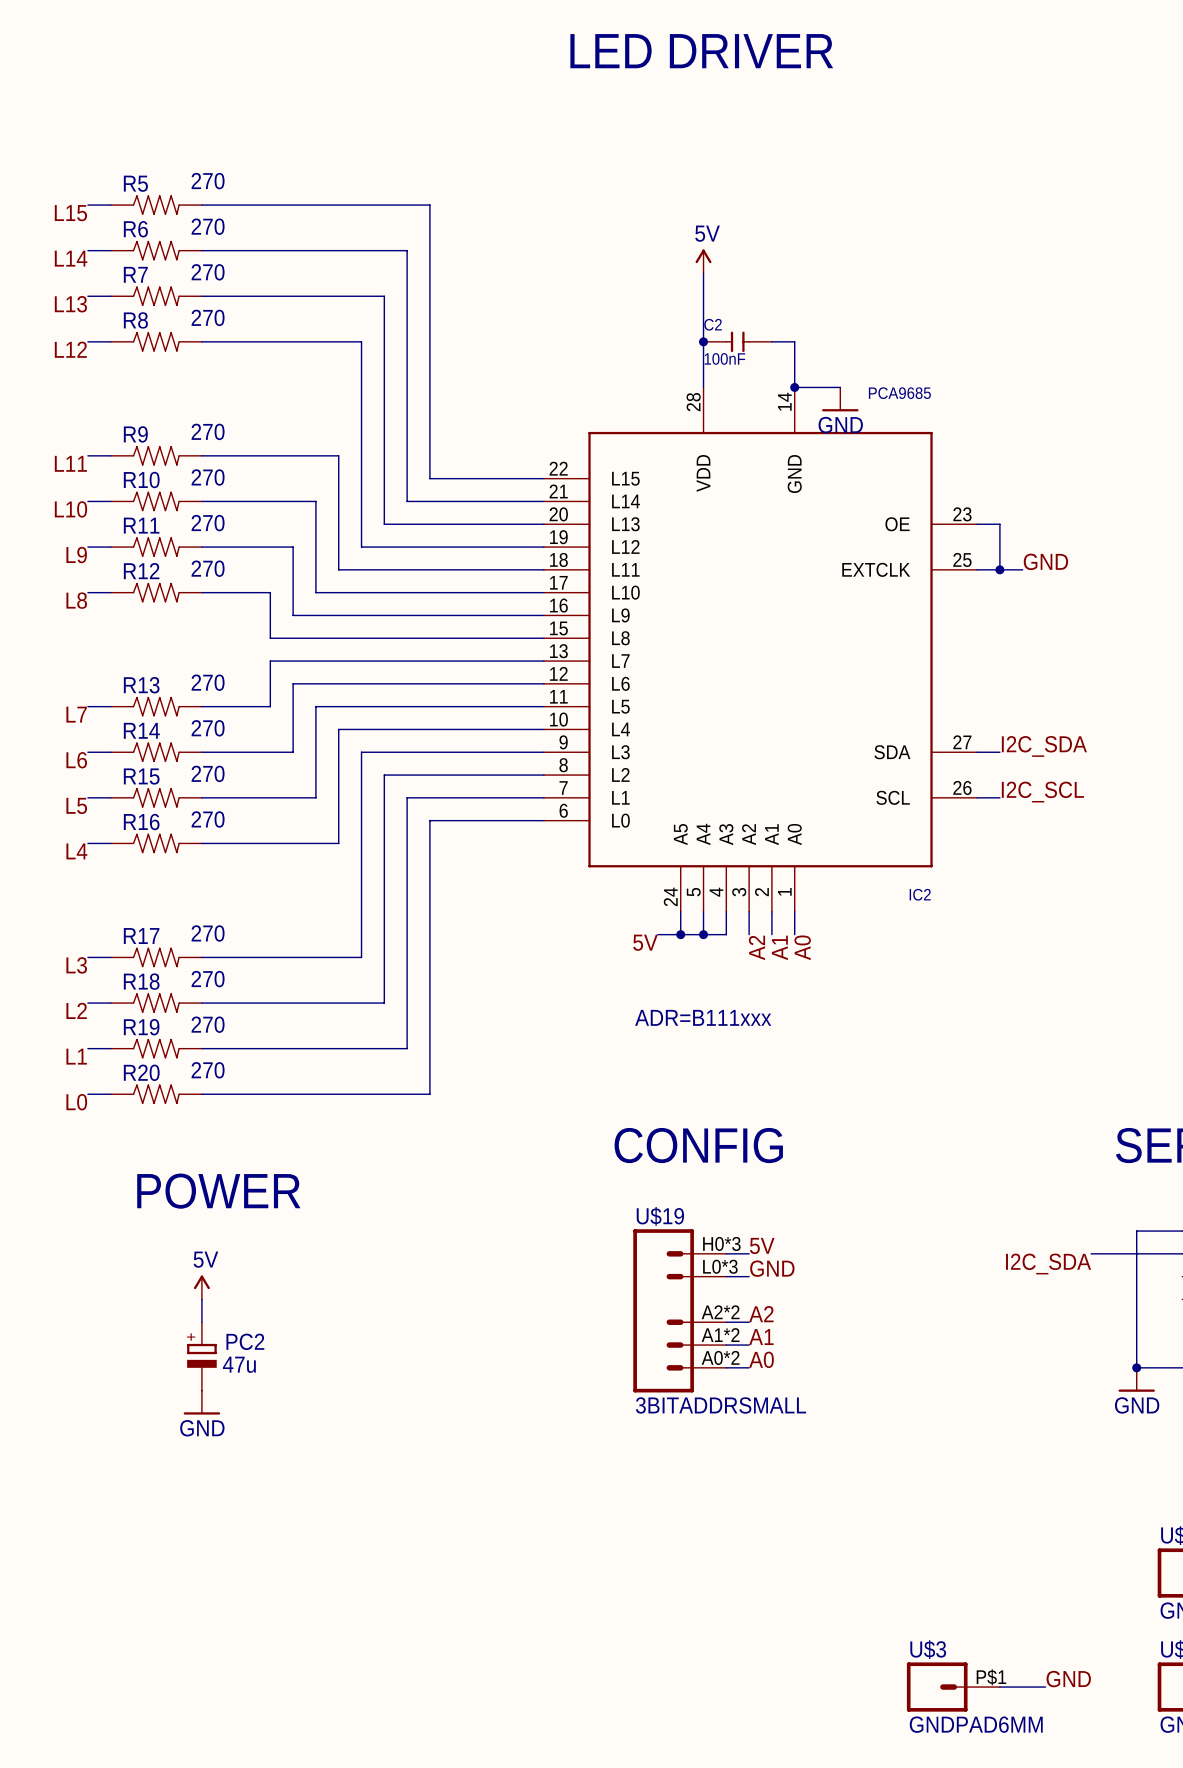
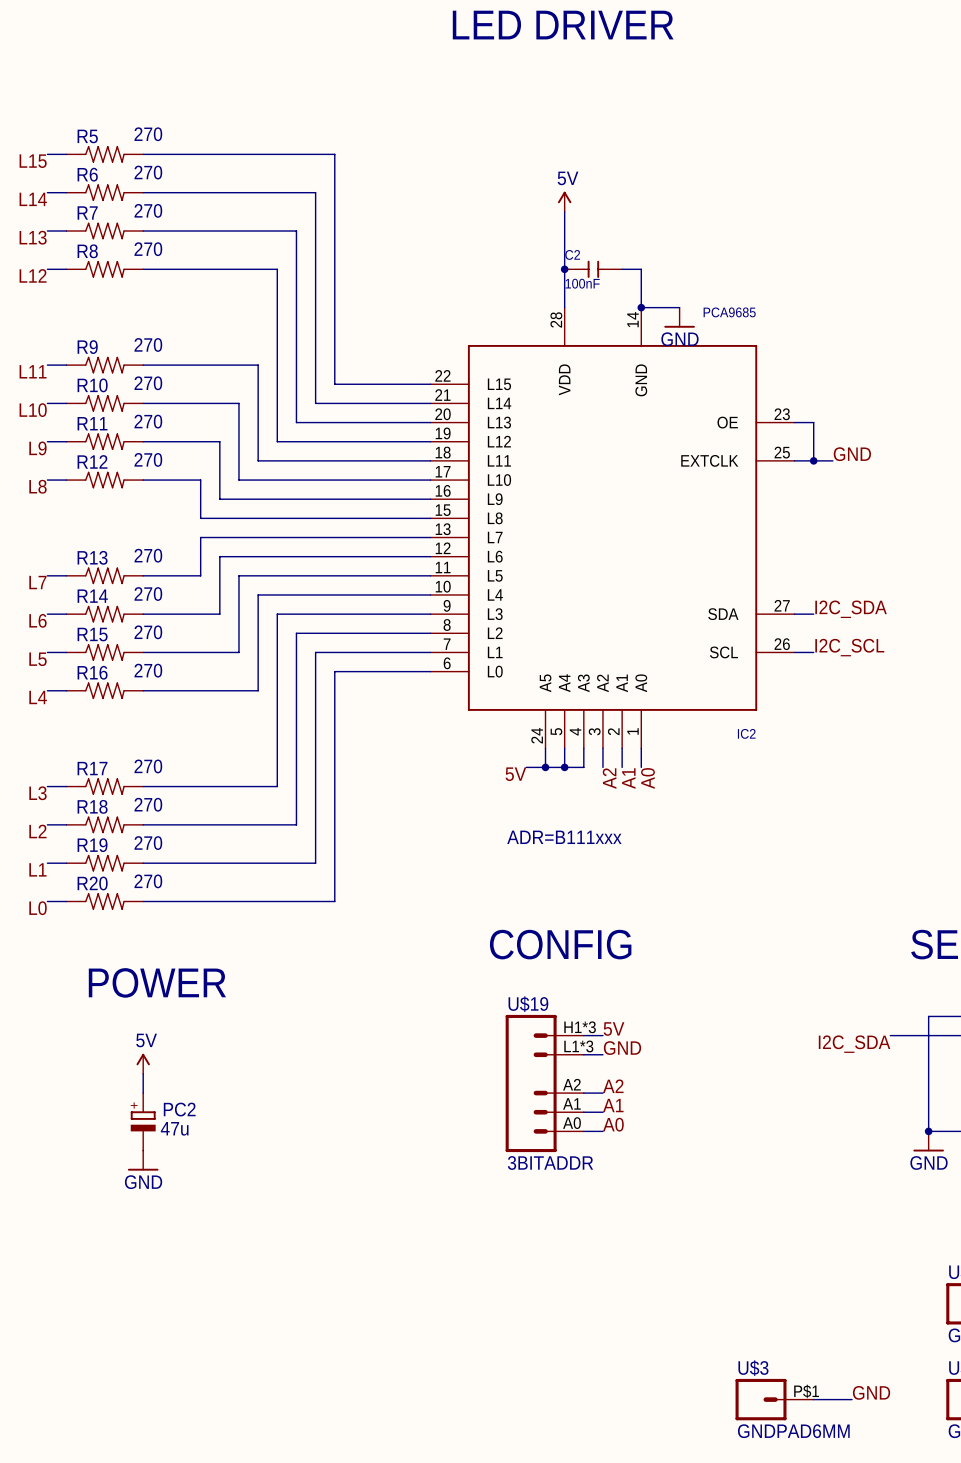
U$19 pin number: H0*3 (721, 1243) -> H1*3 (580, 1027)
U$19 pin number: L0*3 (720, 1266) -> L1*3 (578, 1046)
U$19 pin number: A2*2 (720, 1312) -> A2 (571, 1084)
U$19 pin number: A1*2 (720, 1335) -> A1 (571, 1103)
U$19 pin number: A0*2 (720, 1357) -> A0 (571, 1123)
U$19 value: 3BITADDRSMALL (721, 1405) -> 3BITADDR (550, 1162)

